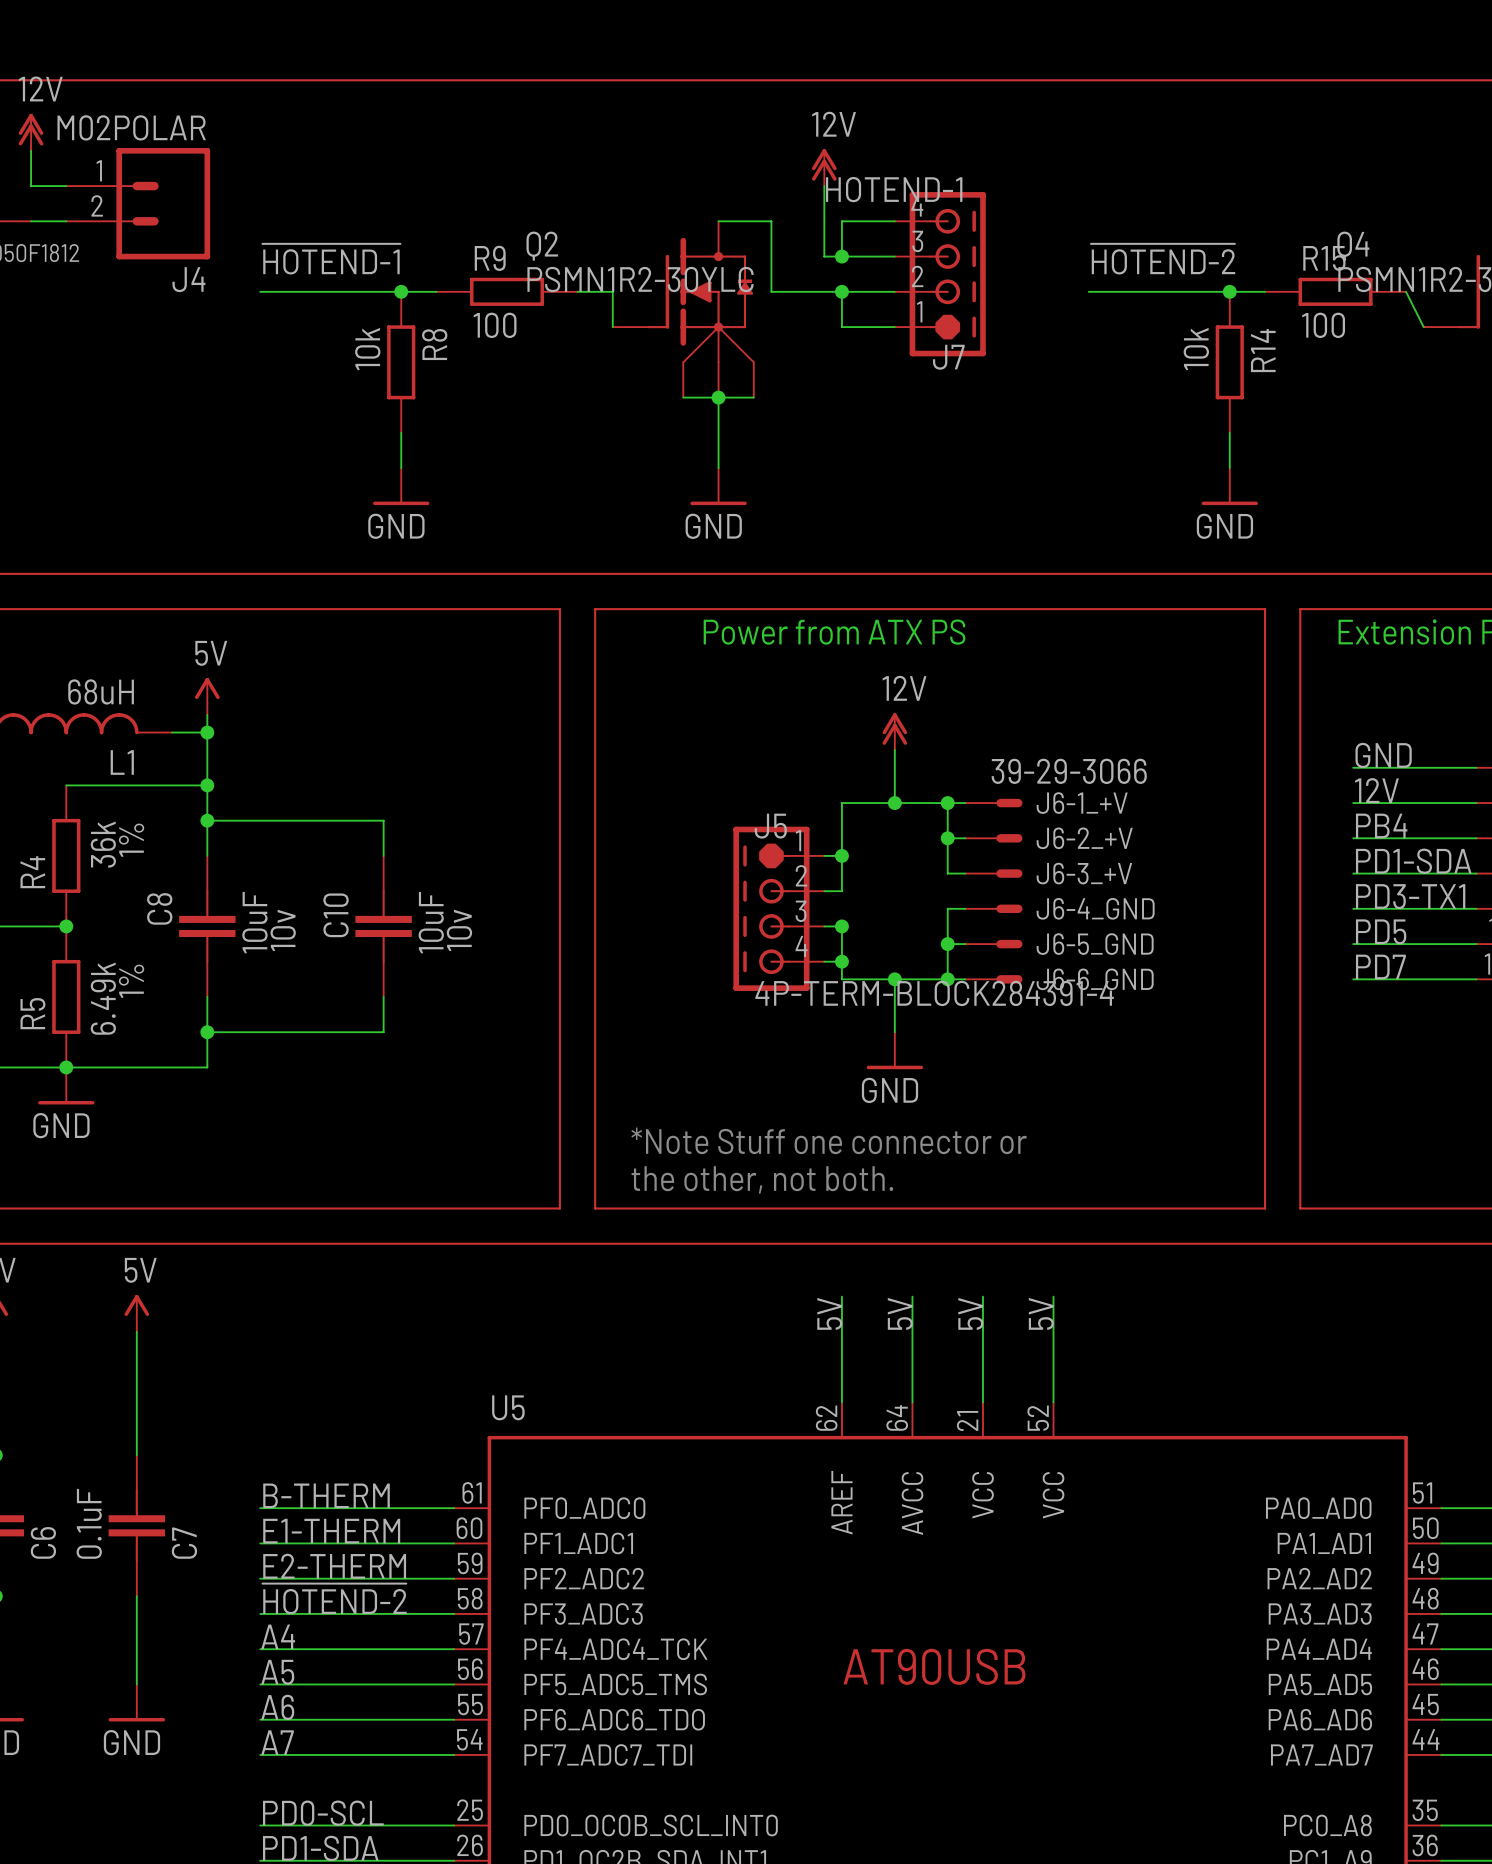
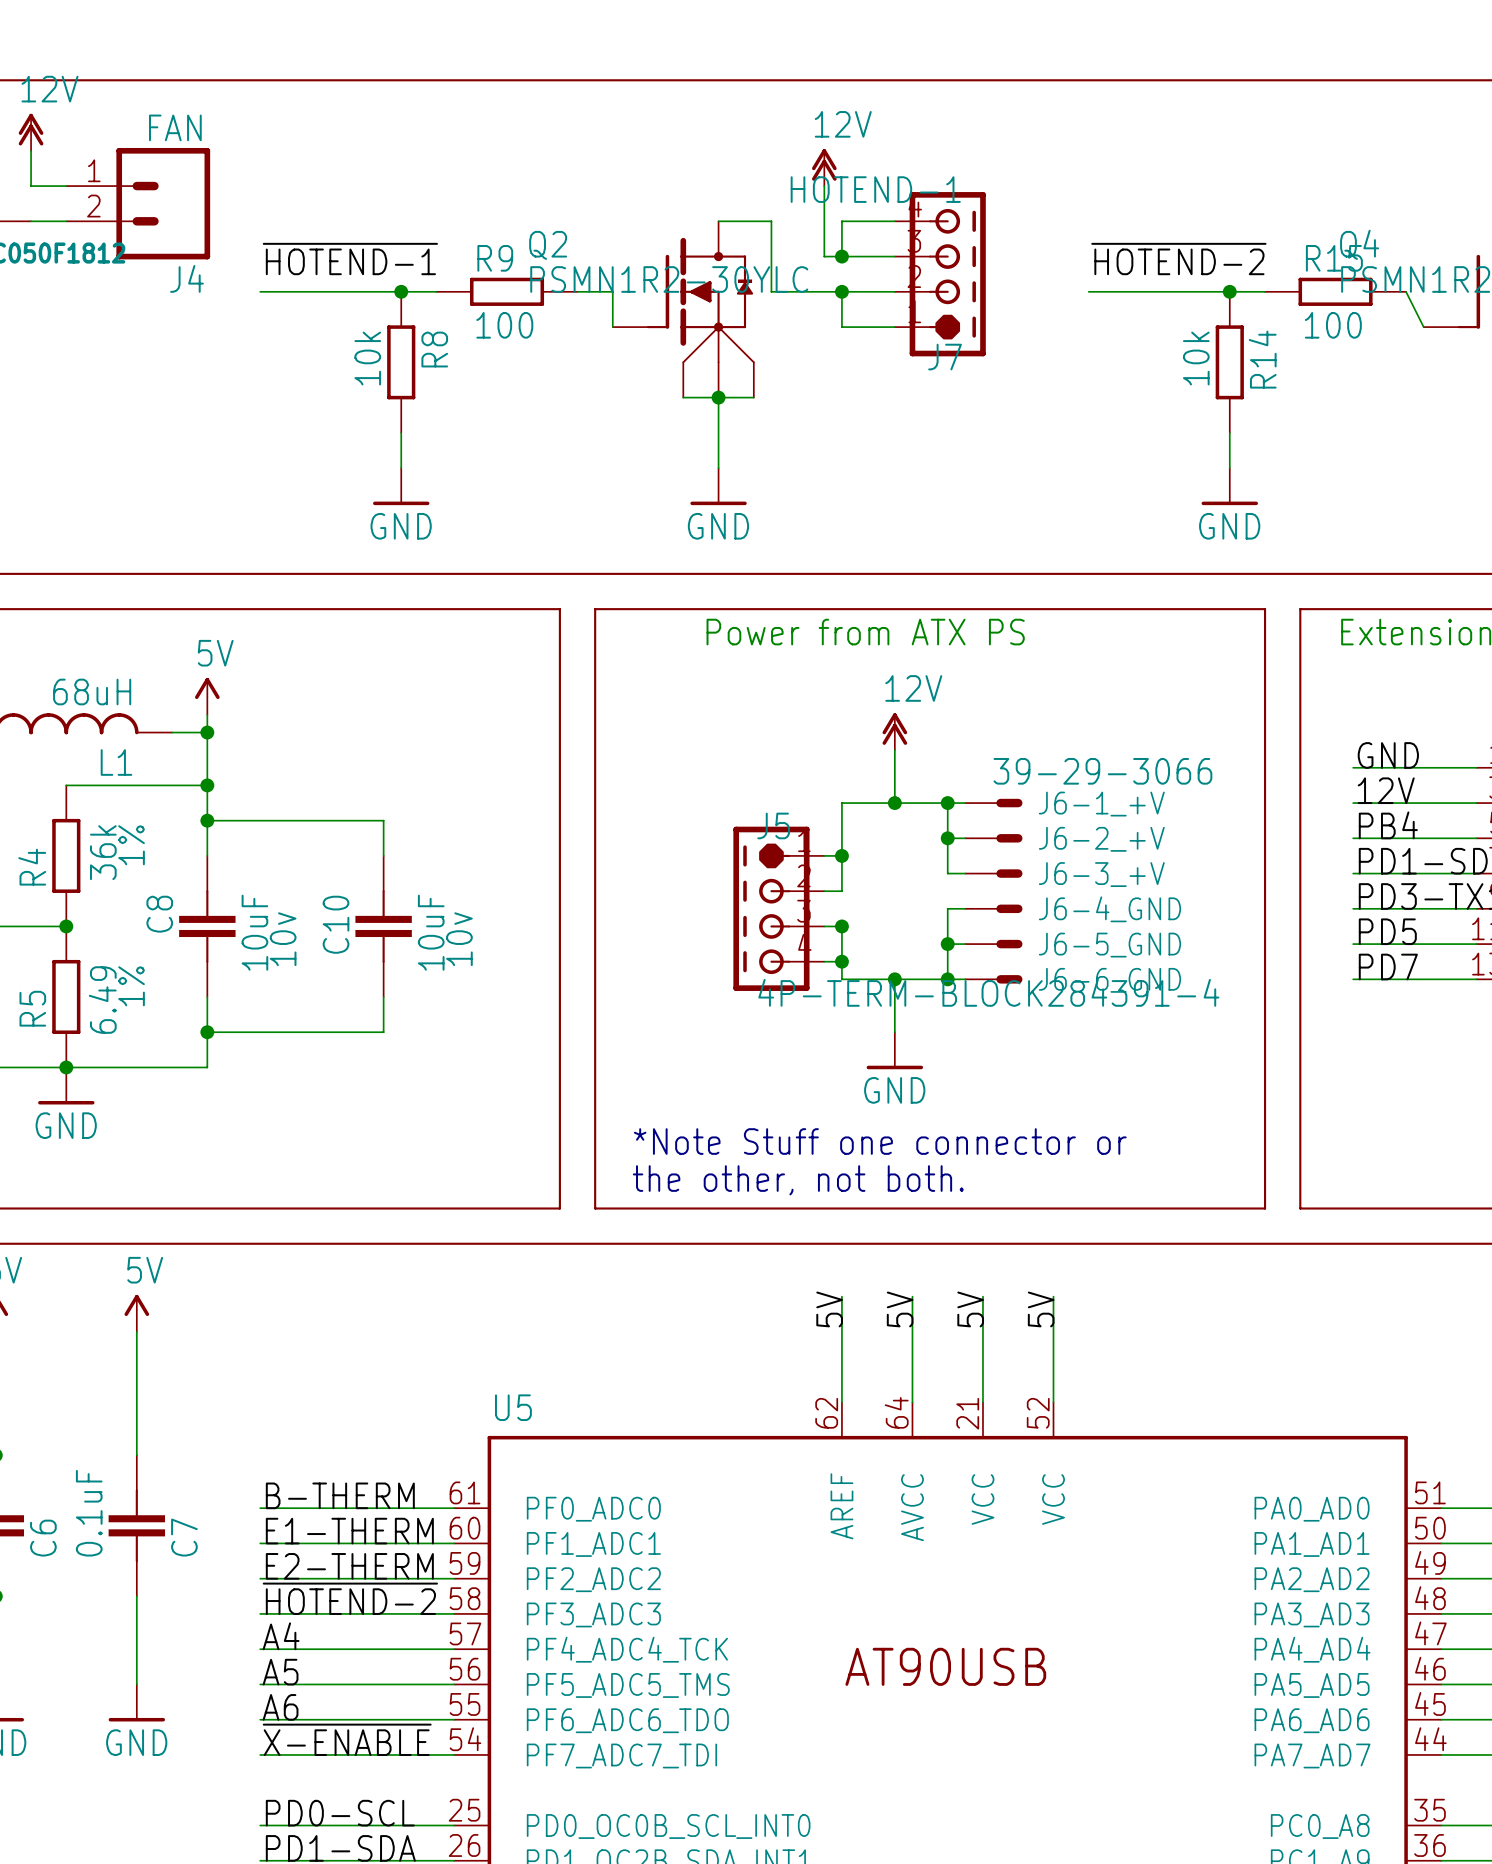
J4 value: M02POLAR (131, 127) -> FAN (175, 127)
R5 value: 6.49k (103, 998) -> 6.49 (102, 1000)
label: A7 (277, 1742) -> ~{X-ENABLE} (347, 1739)

